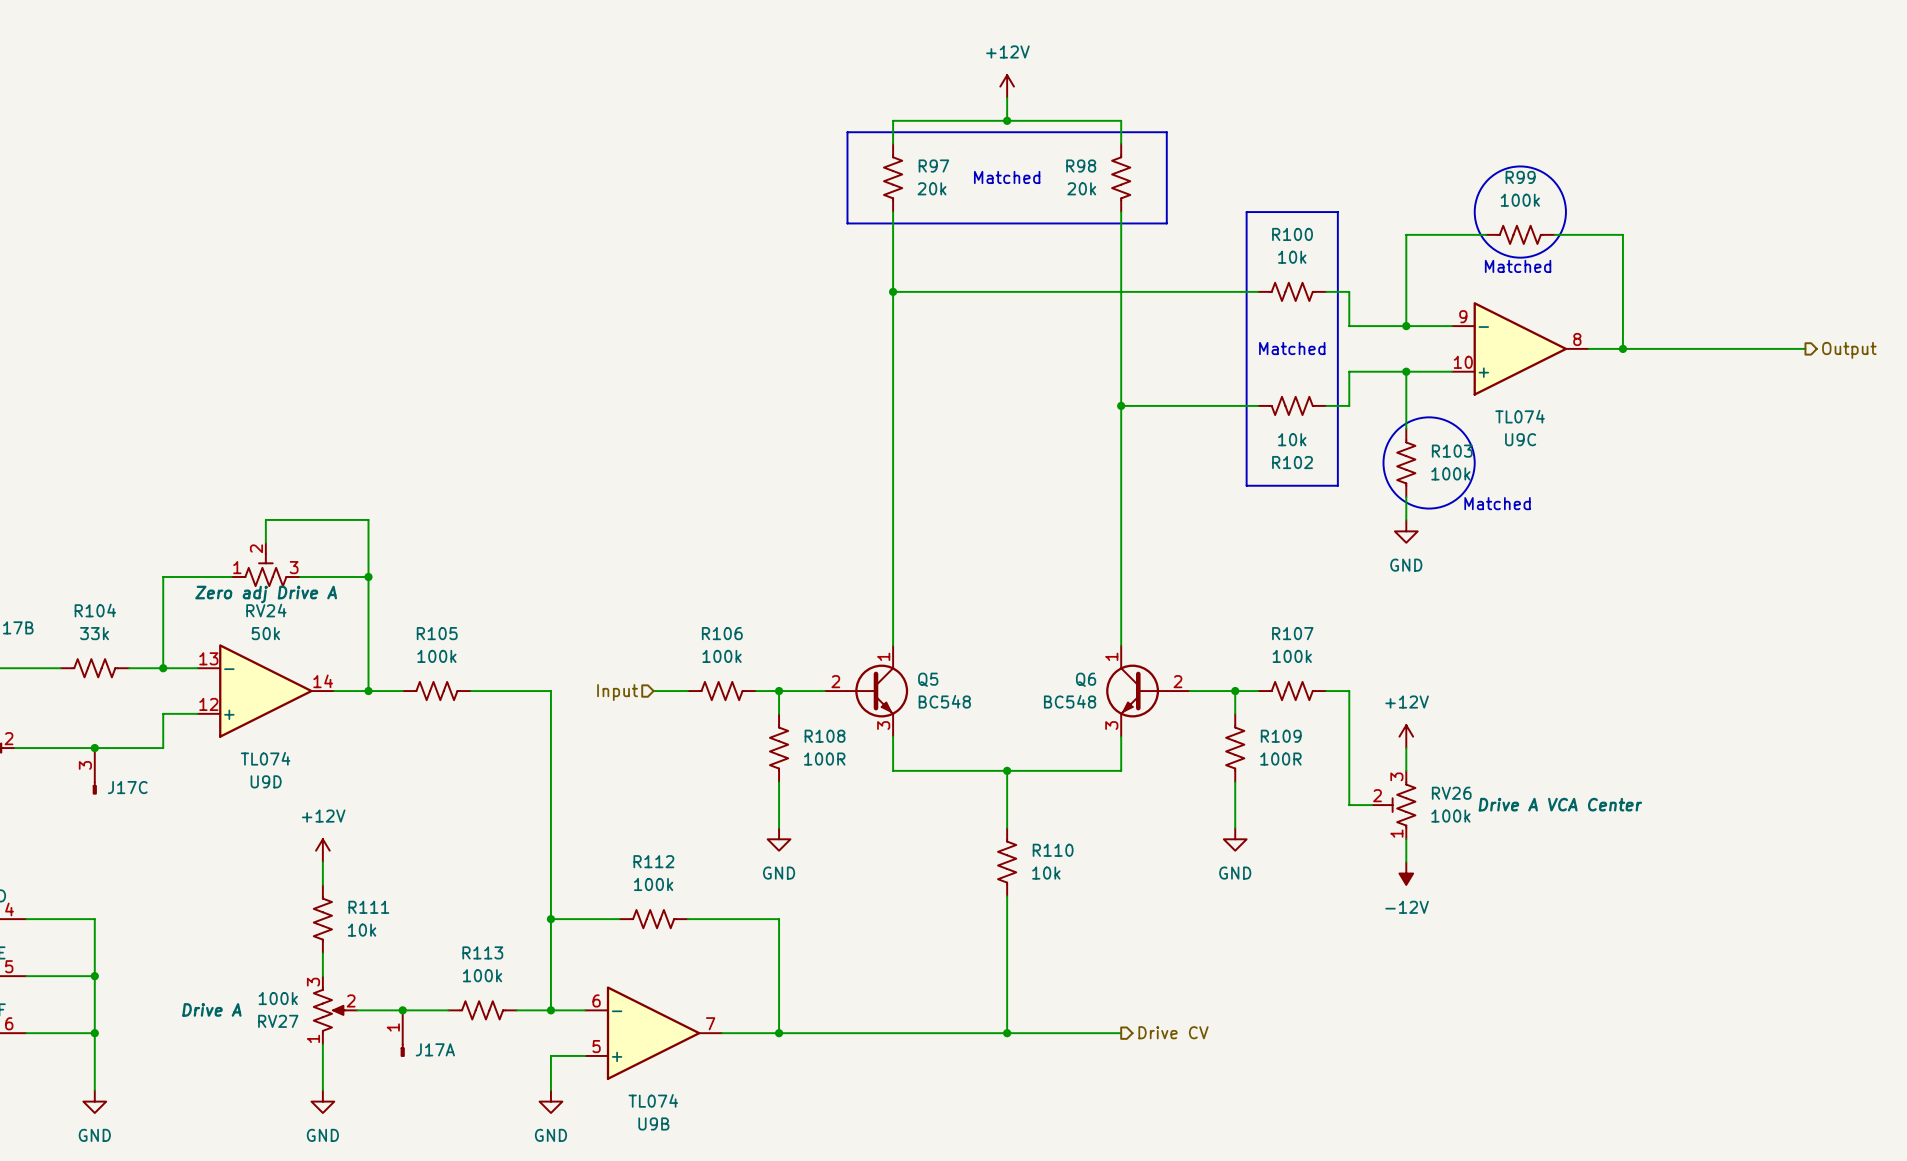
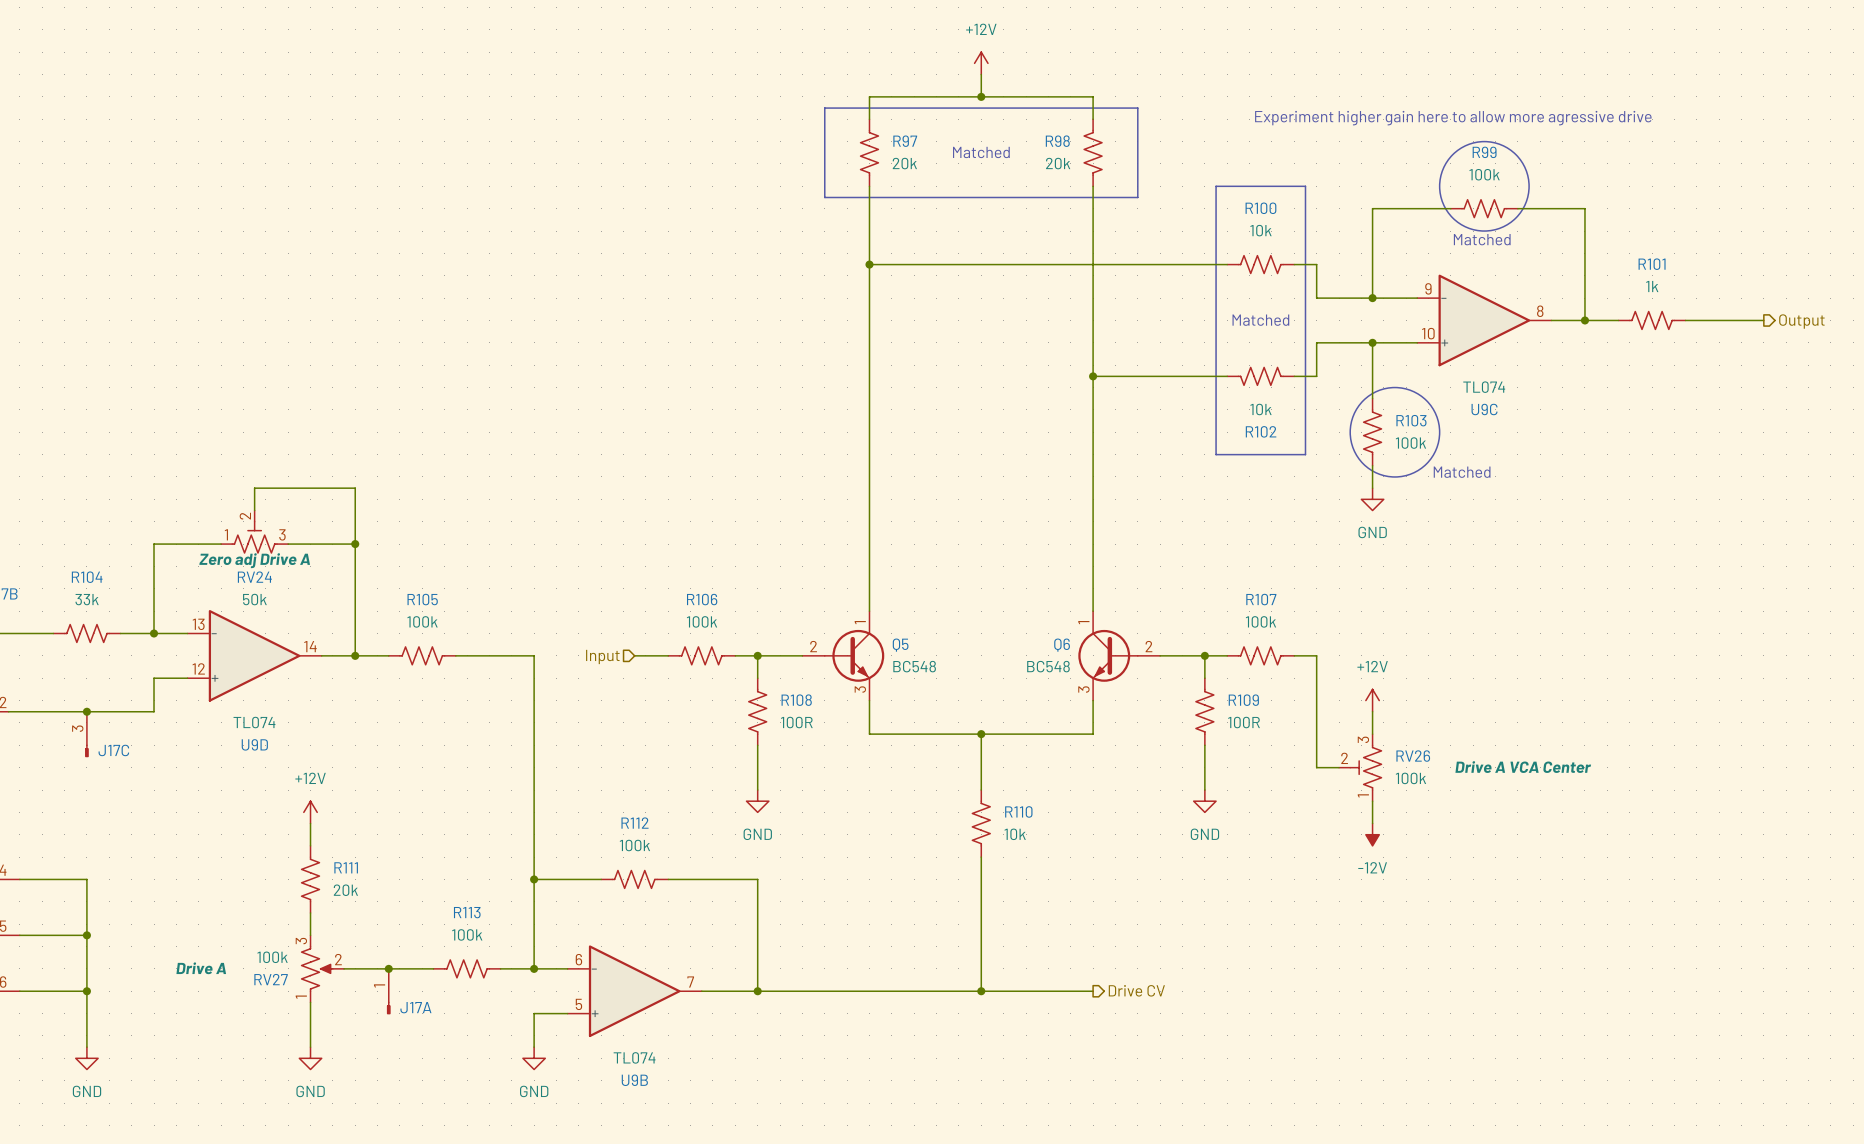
text: none -> Experiment higher gain here to allow more agressive drive (1453, 118)
R101: none -> 1k (1652, 320)
R111 value: 10k (362, 930) -> 20k (345, 890)

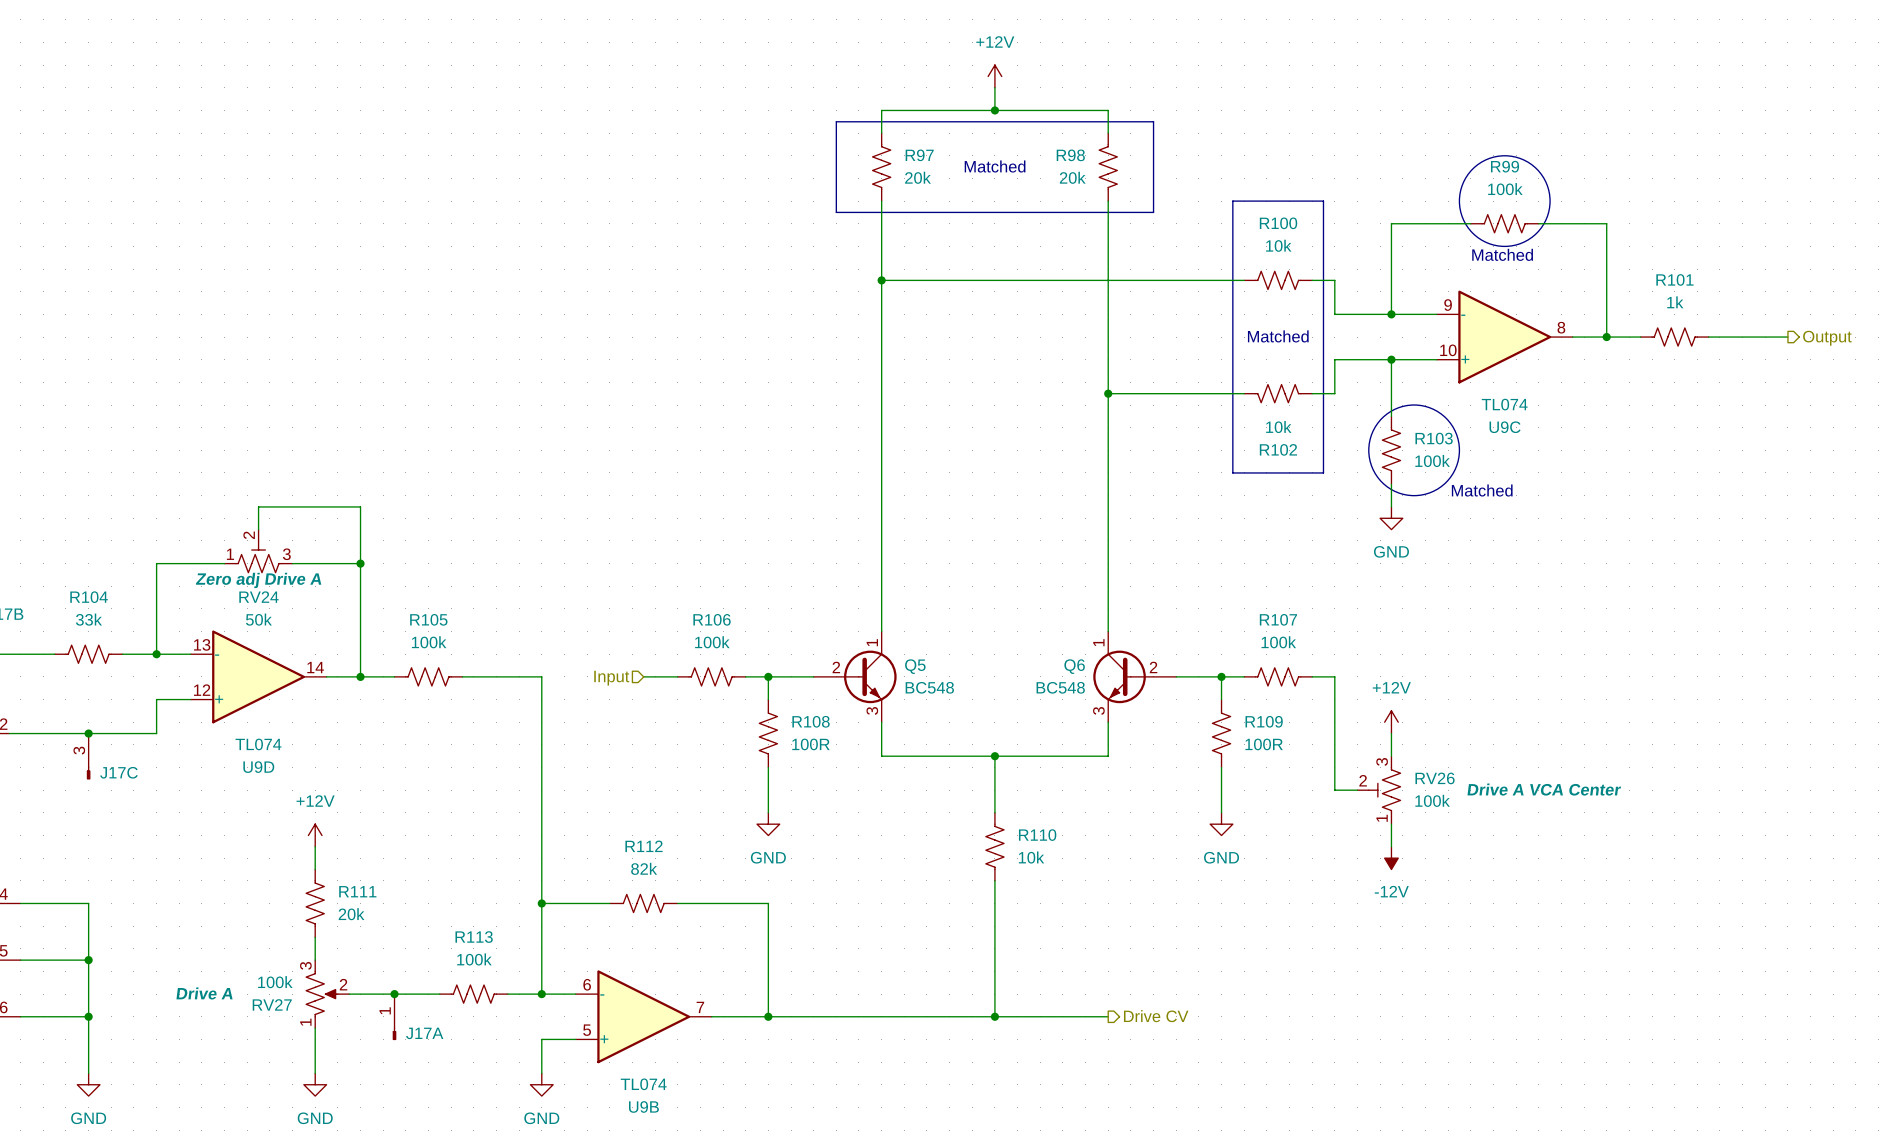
text: Experiment higher gain here to allow more agressive drive (1453, 118) -> none
Q5 symbol: [802, 611, 885, 701] -> [813, 631, 897, 723]
Q6 symbol: [1078, 611, 1161, 701] -> [1093, 631, 1177, 723]
R112 value: 100k (634, 845) -> 82k (644, 868)

